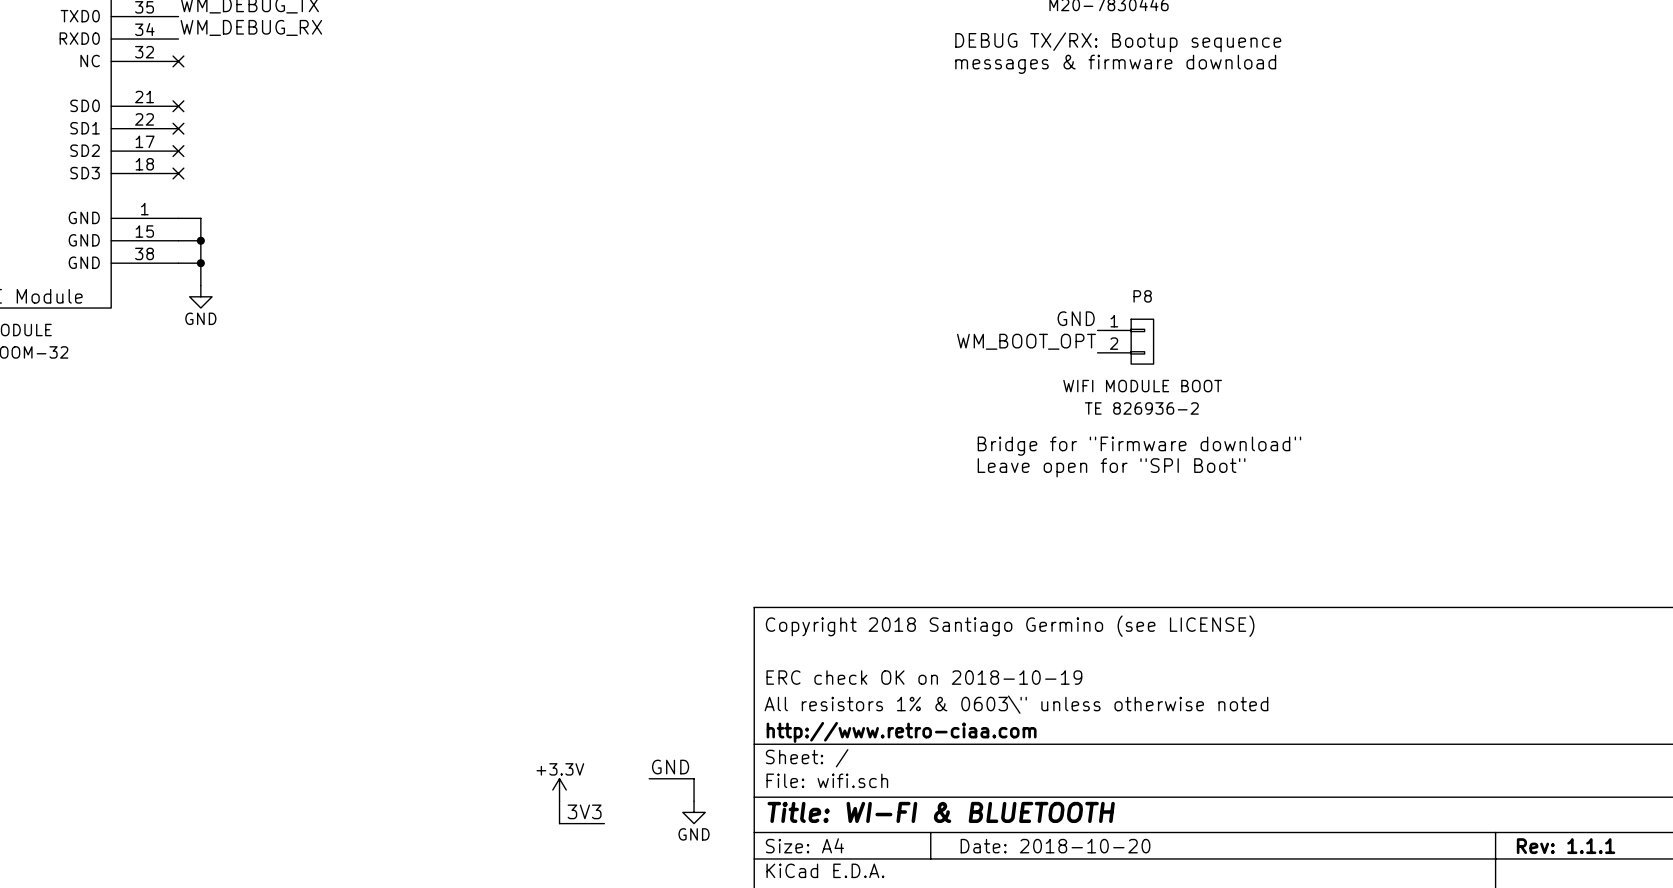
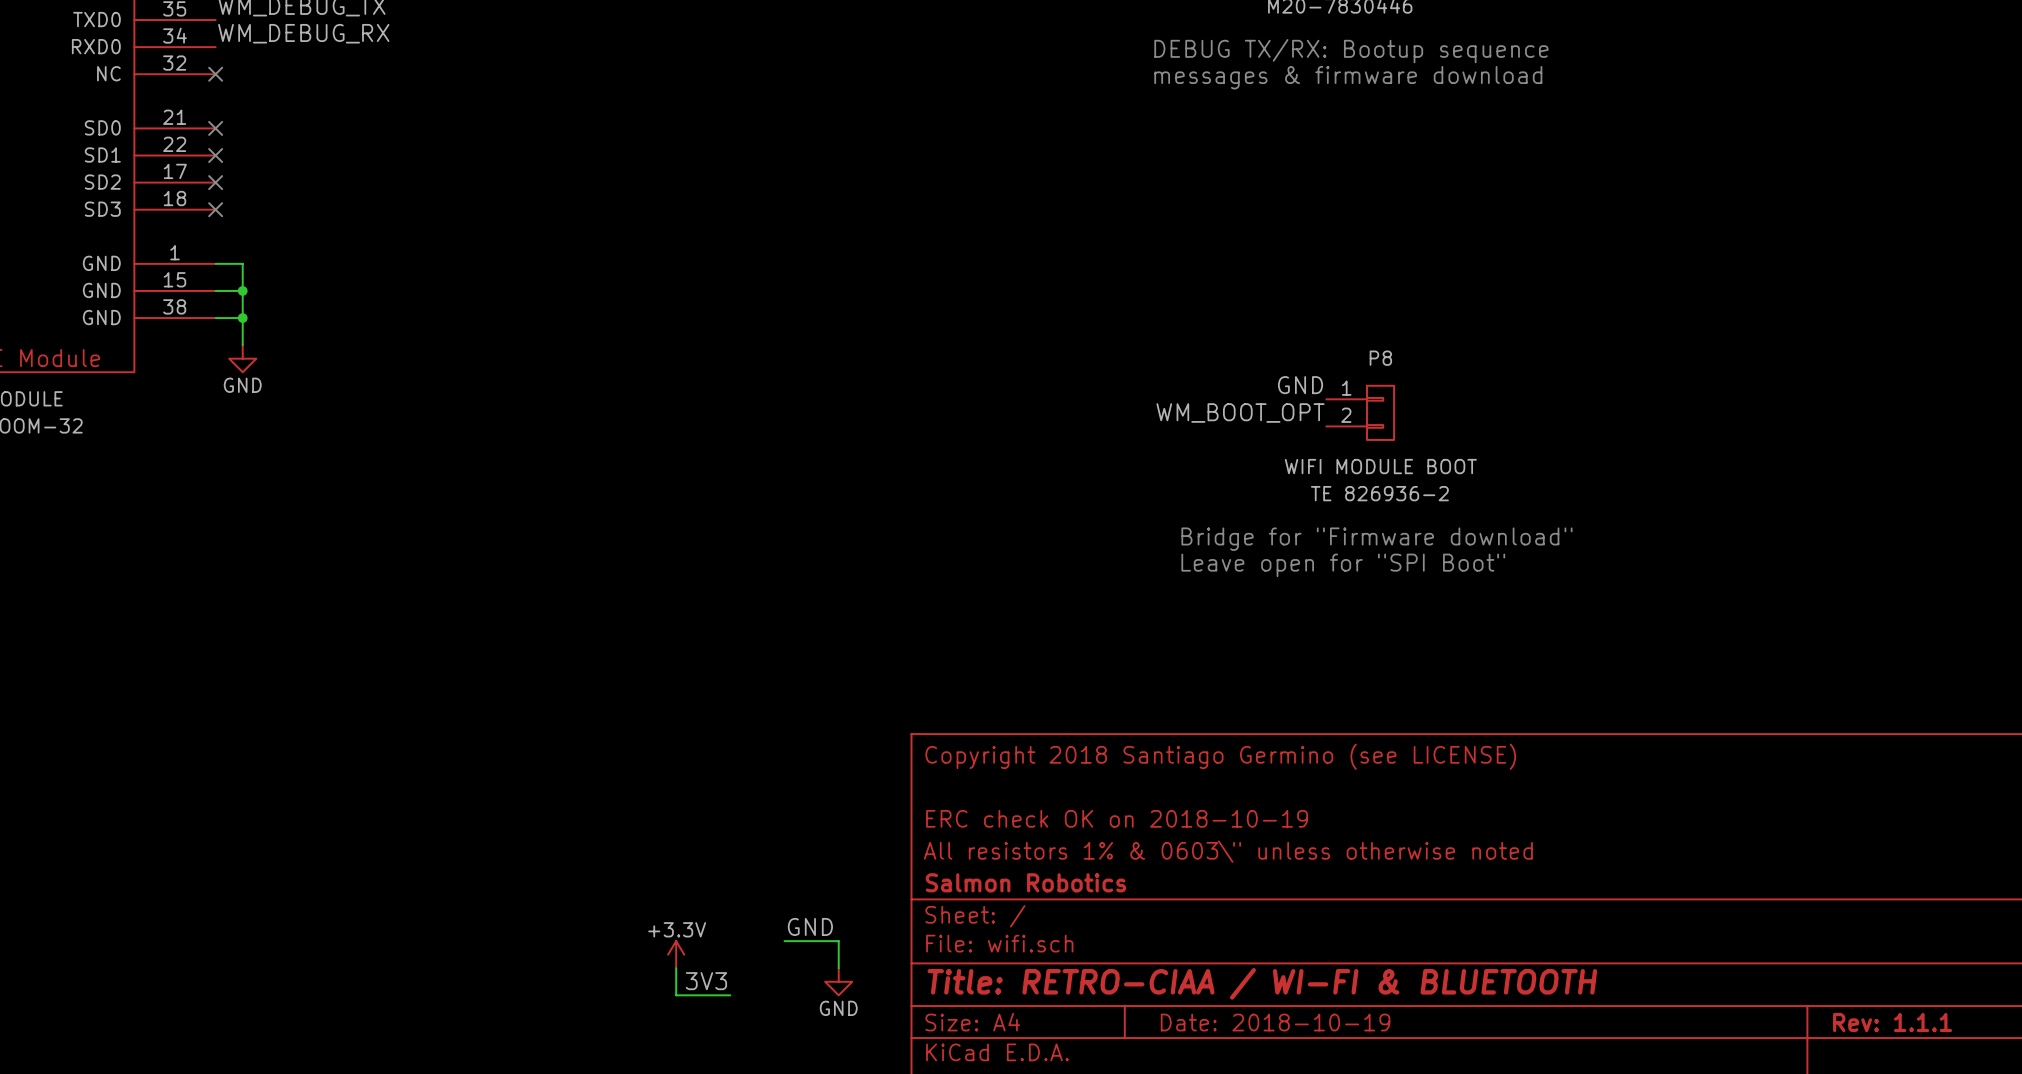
title block: http://www.retro-ciaa.com (901, 732) -> Salmon Robotics (1025, 882)
title block: Title: WI-FI & BLUETOOTH (941, 812) -> Title: RETRO-CIAA / WI-FI & BLUETOOTH (1262, 983)
title block: Date: 2018-10-20 (1055, 846) -> Date: 2018-10-19 (1275, 1022)

